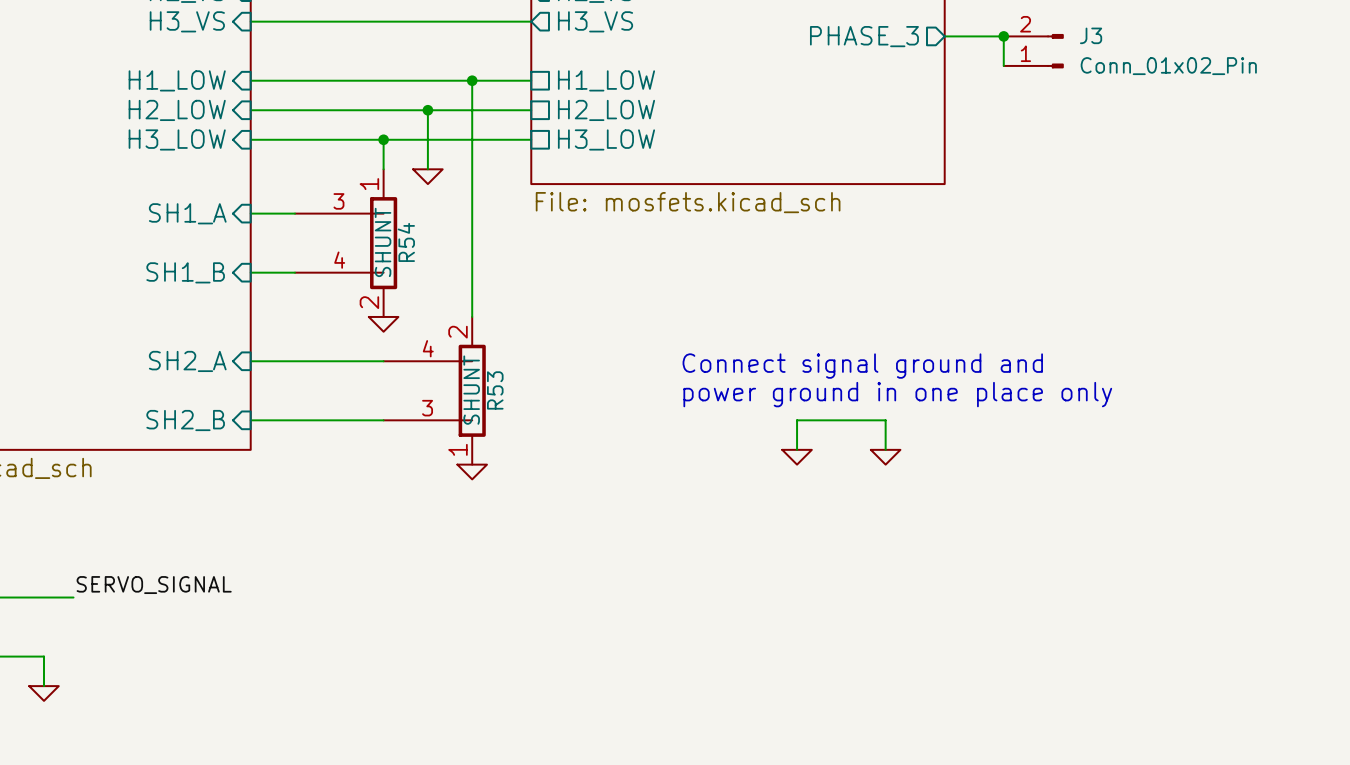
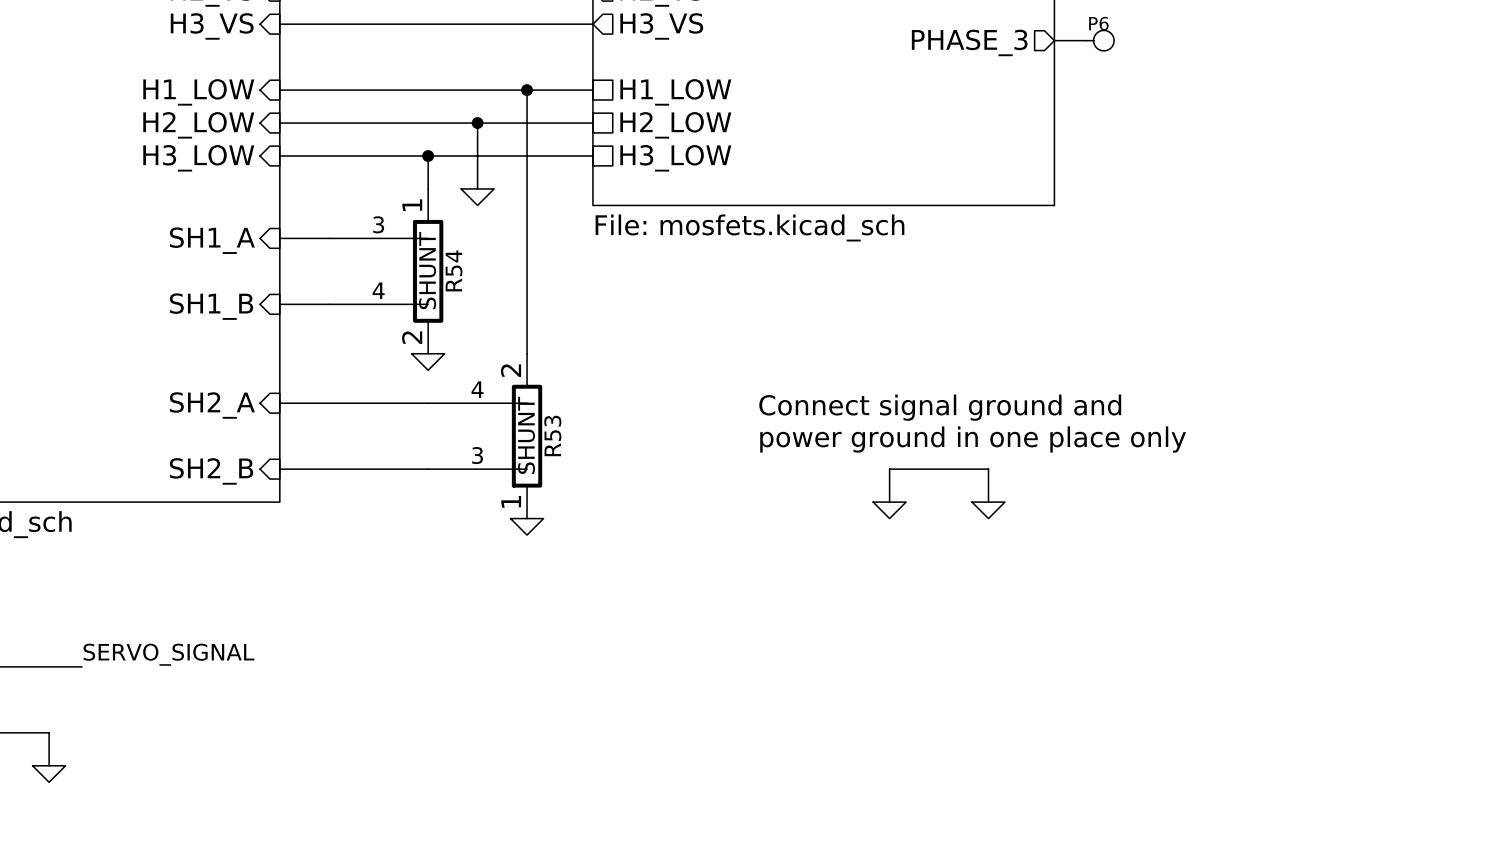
wire: (944, 36) (1003, 36) (1003, 65) -> none
P6: none -> (1084, 40)
junction: (1003, 36) -> none
J3: Conn_01x02_Pin (1033, 51) -> none

